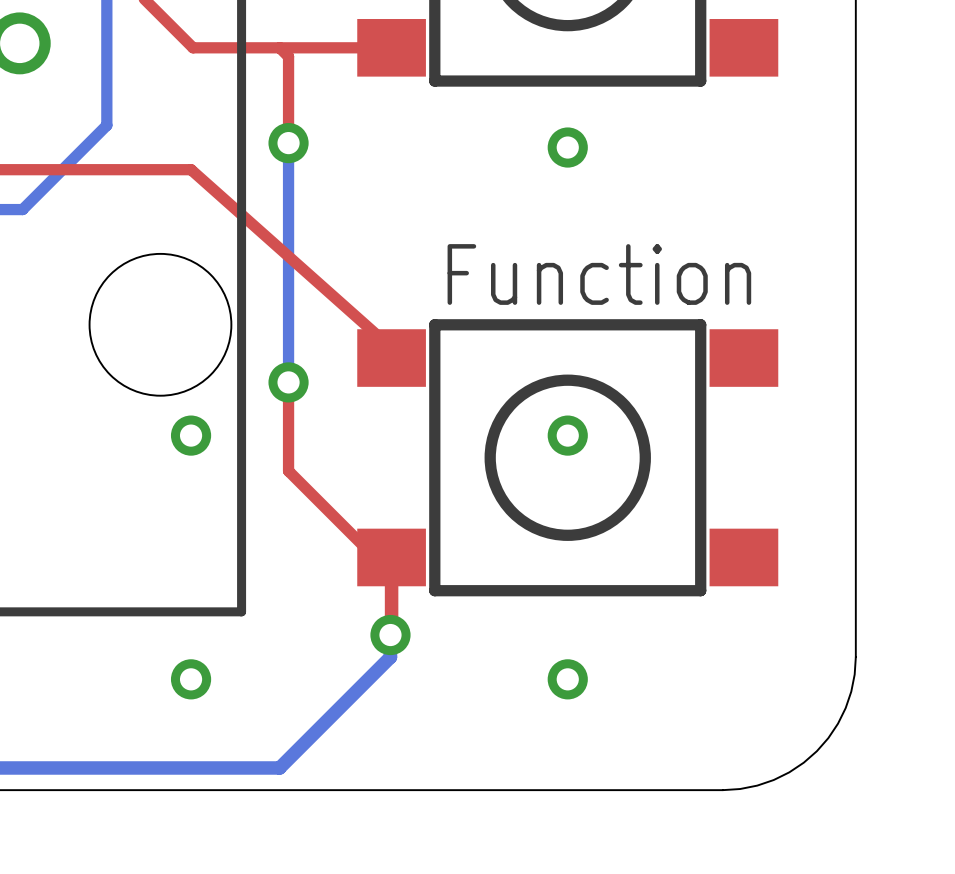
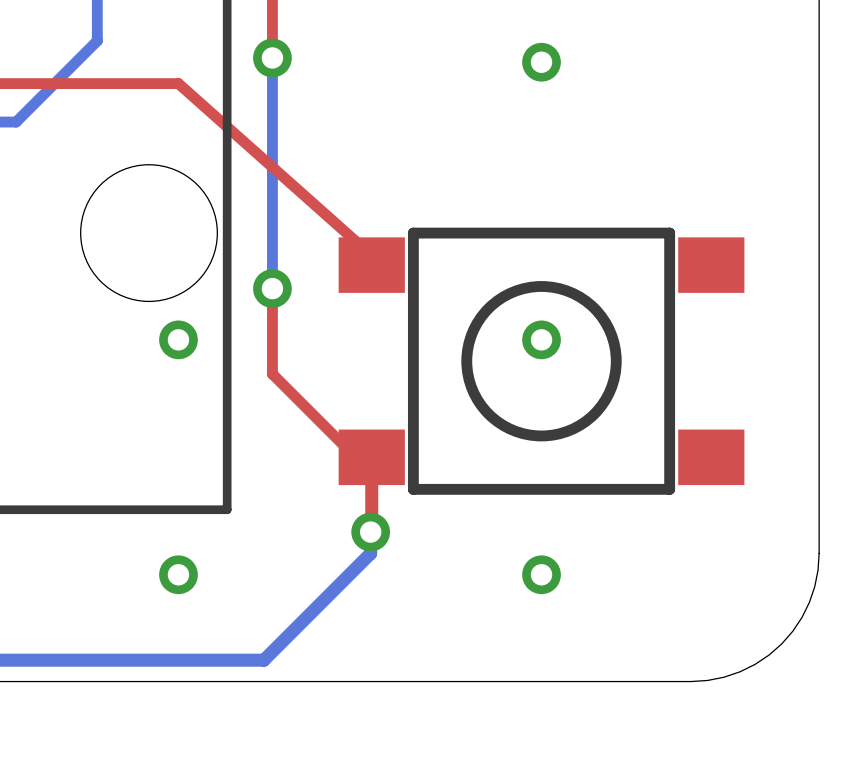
text: Function (599, 274) -> none

